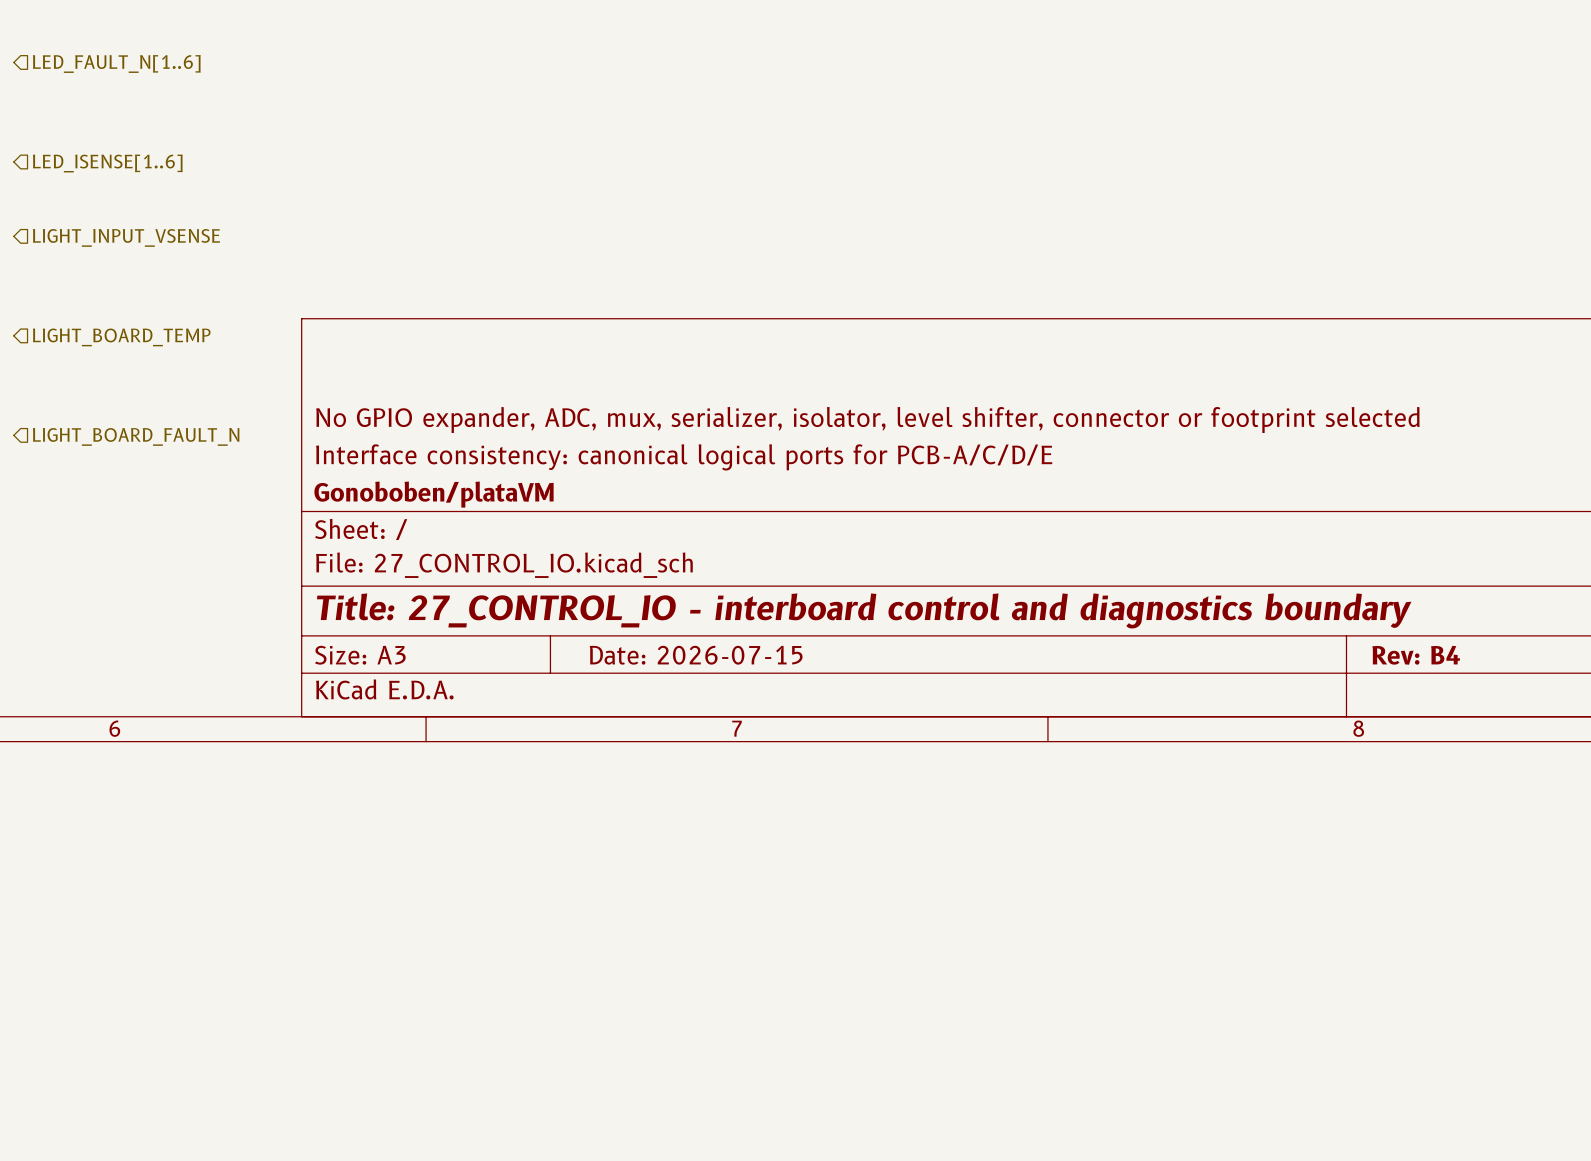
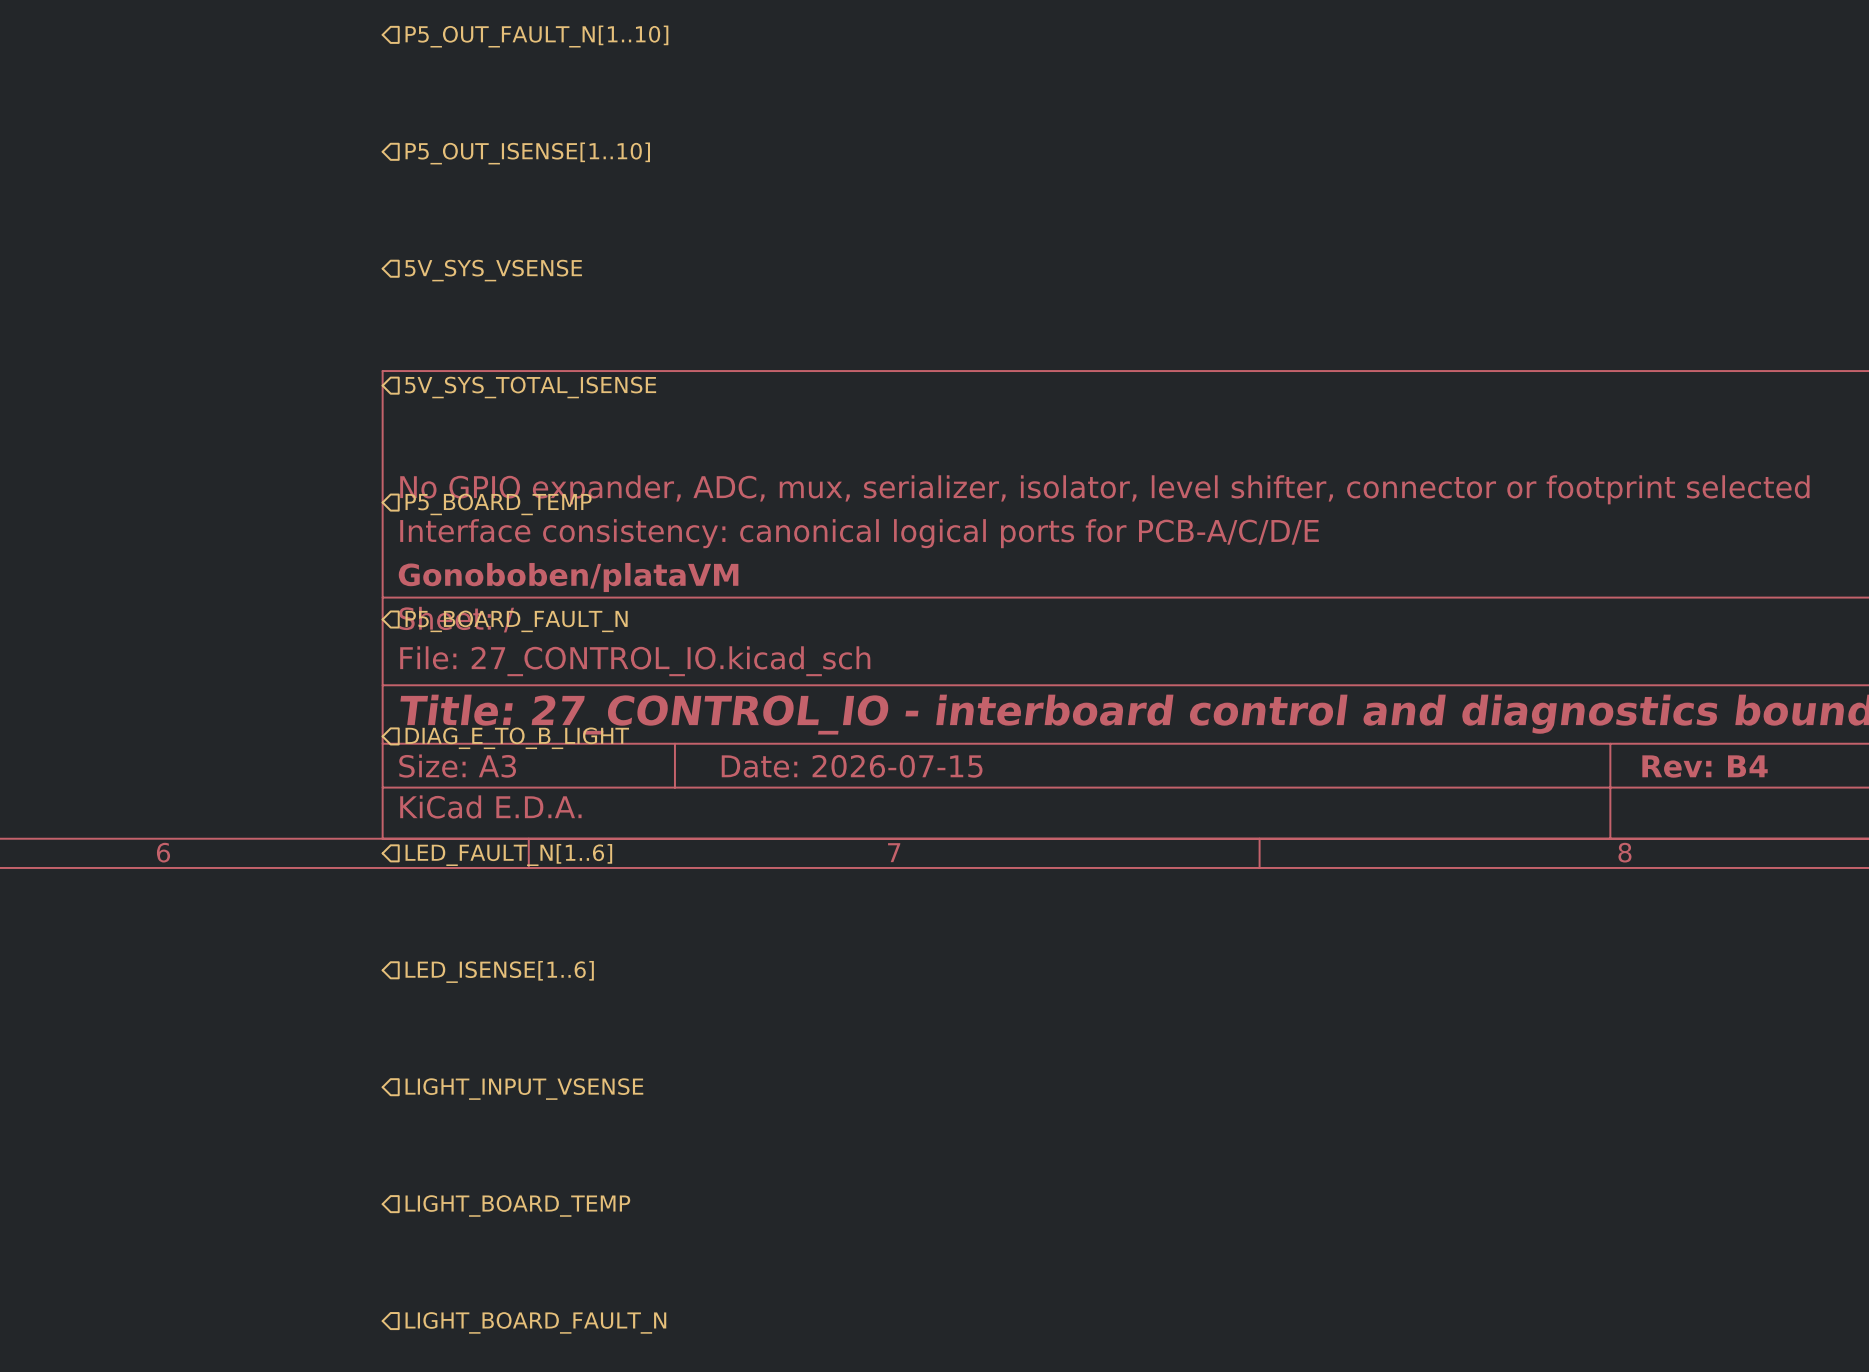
hierarchical label: none -> P5_OUT_FAULT_N[1..10] (536, 36)
hierarchical label: LED_FAULT_N[1..6] (116, 64) -> none
hierarchical label: none -> P5_OUT_ISENSE[1..10] (527, 153)
hierarchical label: LED_ISENSE[1..6] (107, 163) -> none
hierarchical label: none -> 5V_SYS_VSENSE (493, 270)
hierarchical label: LIGHT_INPUT_VSENSE (126, 237) -> none
hierarchical label: none -> 5V_SYS_TOTAL_ISENSE (530, 387)
hierarchical label: LIGHT_BOARD_TEMP (121, 337) -> none
hierarchical label: none -> P5_BOARD_TEMP (498, 504)
hierarchical label: LIGHT_BOARD_FAULT_N (136, 436) -> none
hierarchical label: none -> P5_BOARD_FAULT_N (516, 621)
hierarchical label: none -> DIAG_E_TO_B_LIGHT (517, 738)
hierarchical label: none -> LED_FAULT_N[1..6] (508, 855)
hierarchical label: none -> LED_ISENSE[1..6] (499, 971)
hierarchical label: none -> LIGHT_INPUT_VSENSE (524, 1089)
hierarchical label: none -> LIGHT_BOARD_TEMP (517, 1205)
hierarchical label: none -> LIGHT_BOARD_FAULT_N (535, 1322)

